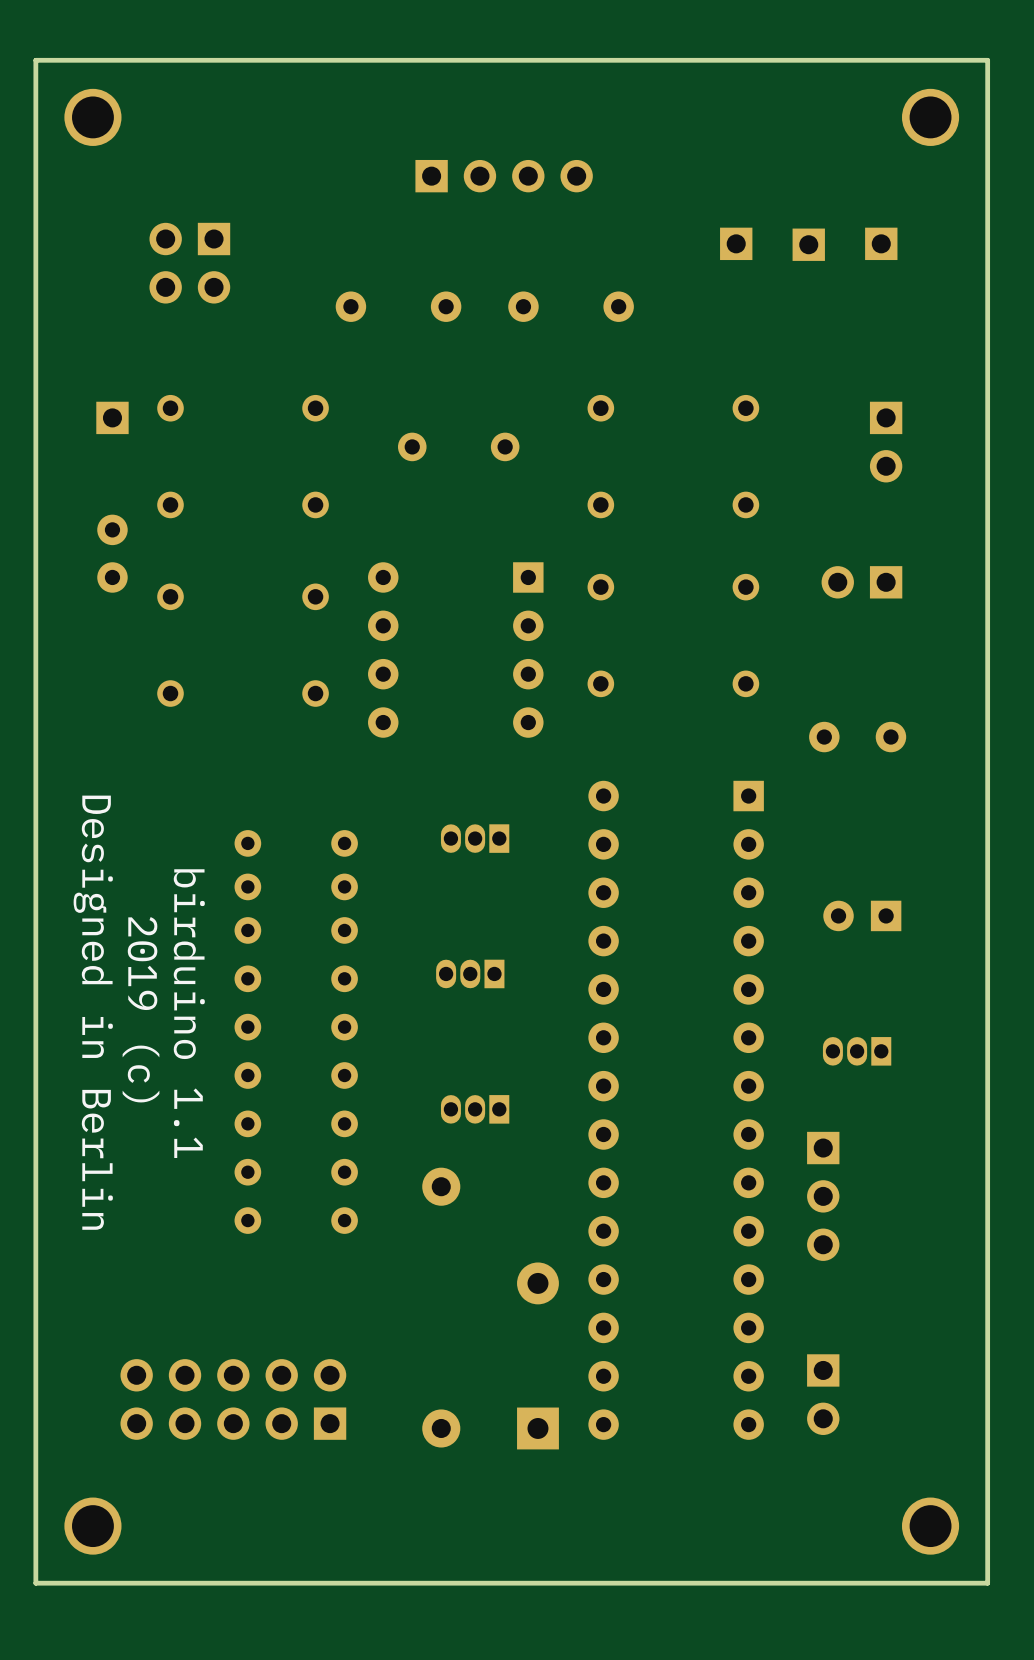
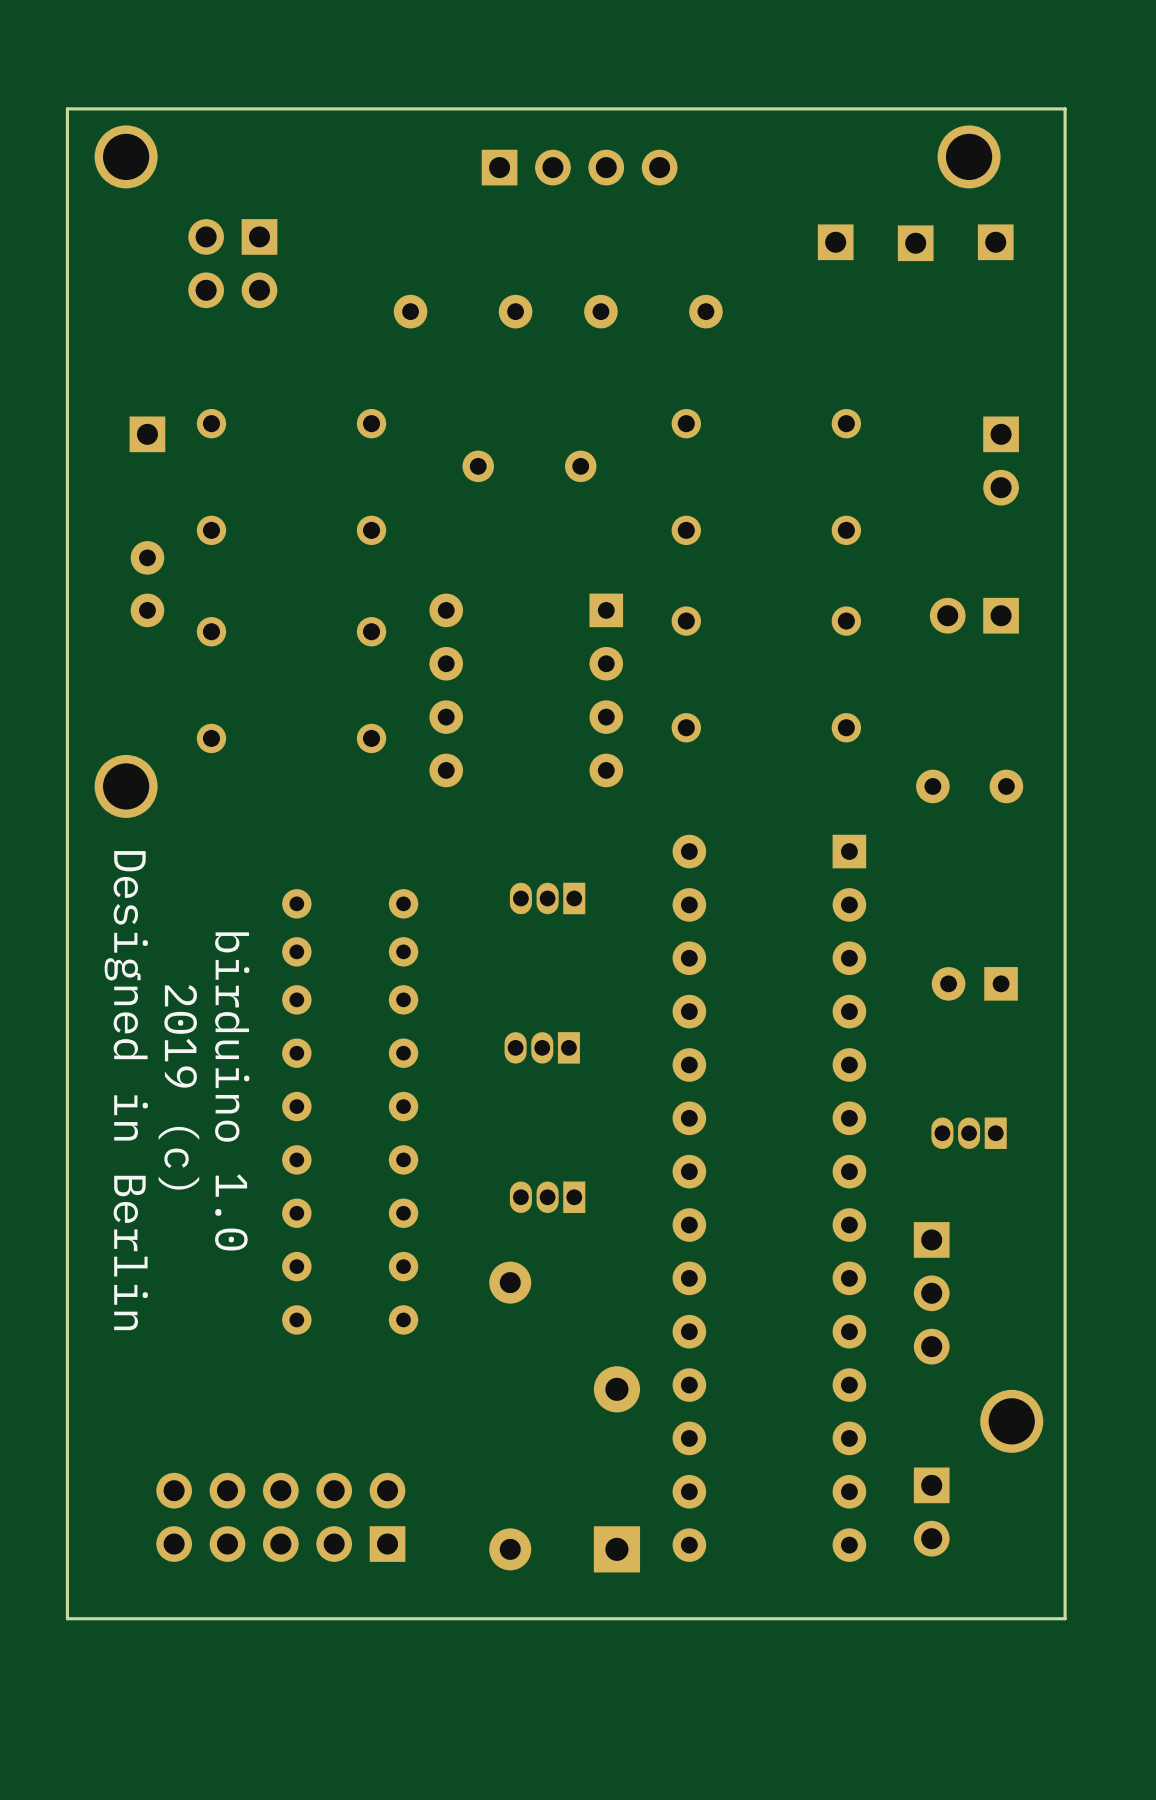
board edge: (987, 60) (35, 60) (35, 1583) (987, 1583) (987, 60) -> (1065, 108) (1065, 1618) (67, 1618) (67, 108) (1065, 108)
part position: (92, 117) -> (126, 156)
part position: (930, 117) -> (969, 156)
part: none -> (126, 786)
text: birduino 1.1 (189, 1013) -> birduino 1.0 (232, 1091)
part: (92, 1526) -> none
part position: (930, 1526) -> (1011, 1421)

